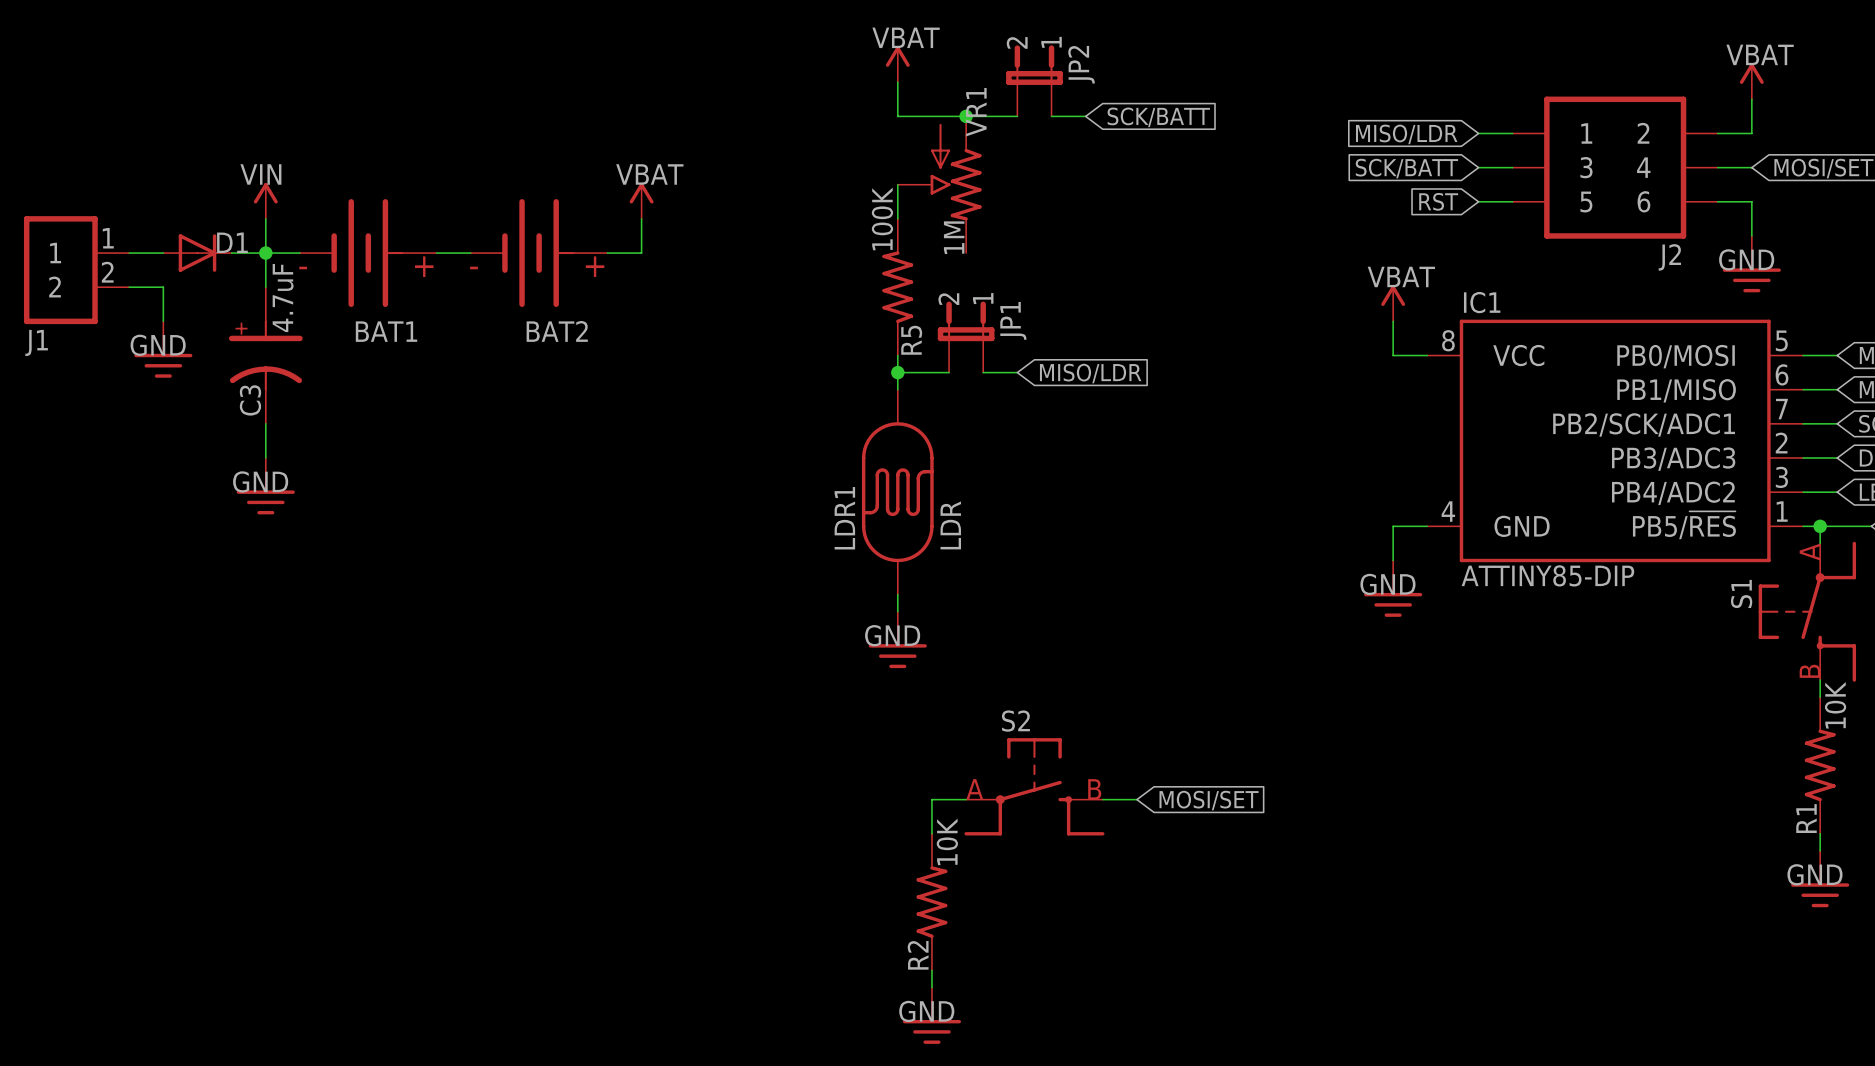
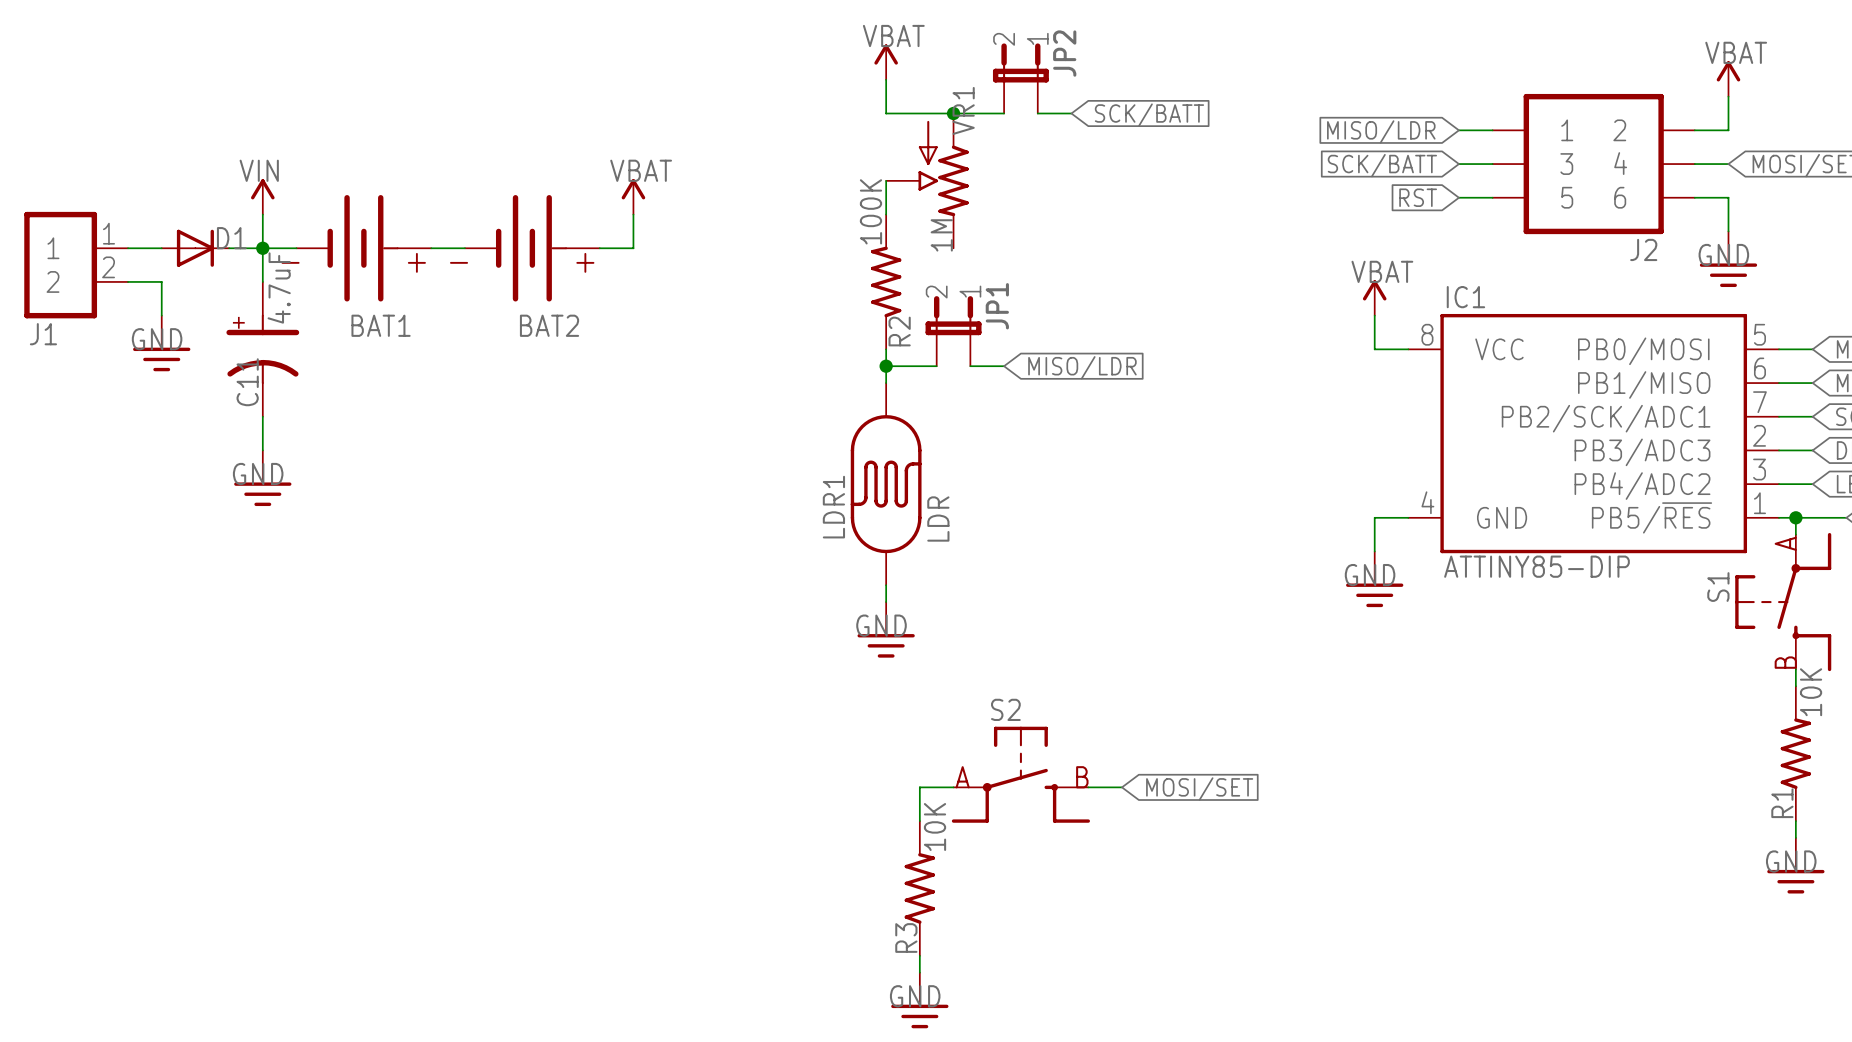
R5 name: R5 (911, 340) -> R2 (899, 331)
C3 name: C3 (250, 400) -> C11 (247, 382)
R2 name: R2 (918, 955) -> R3 (906, 938)

